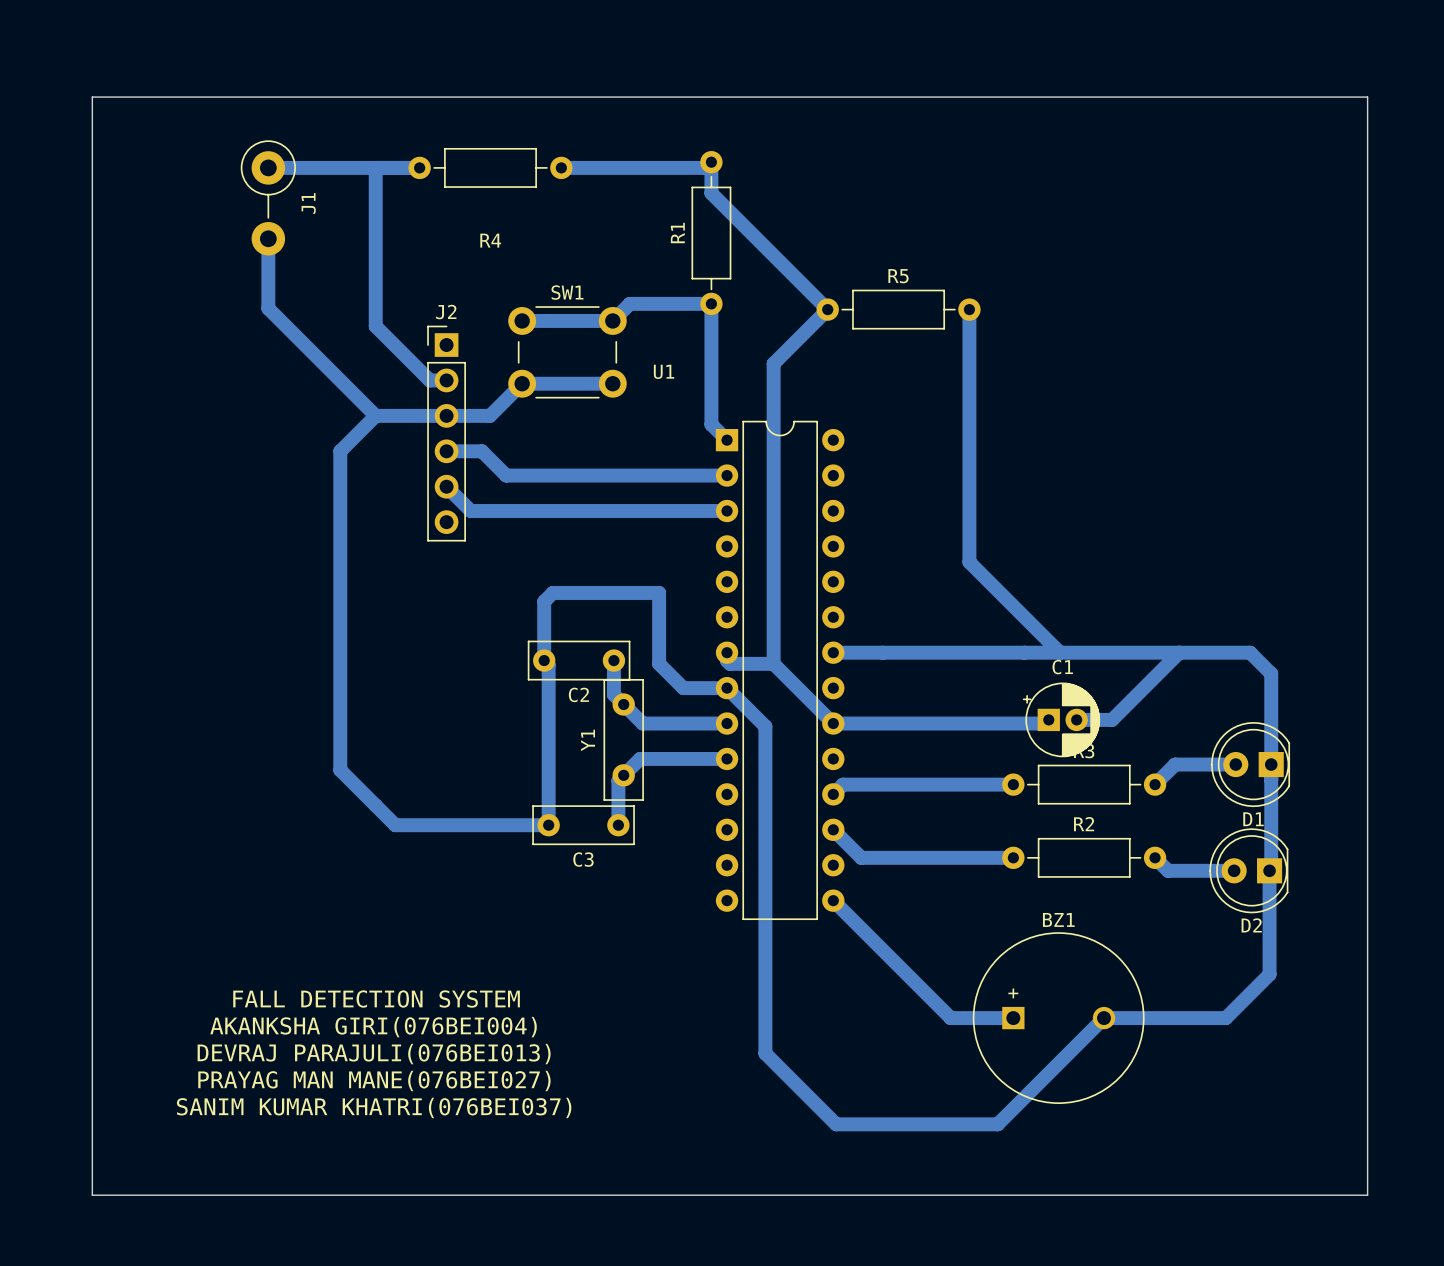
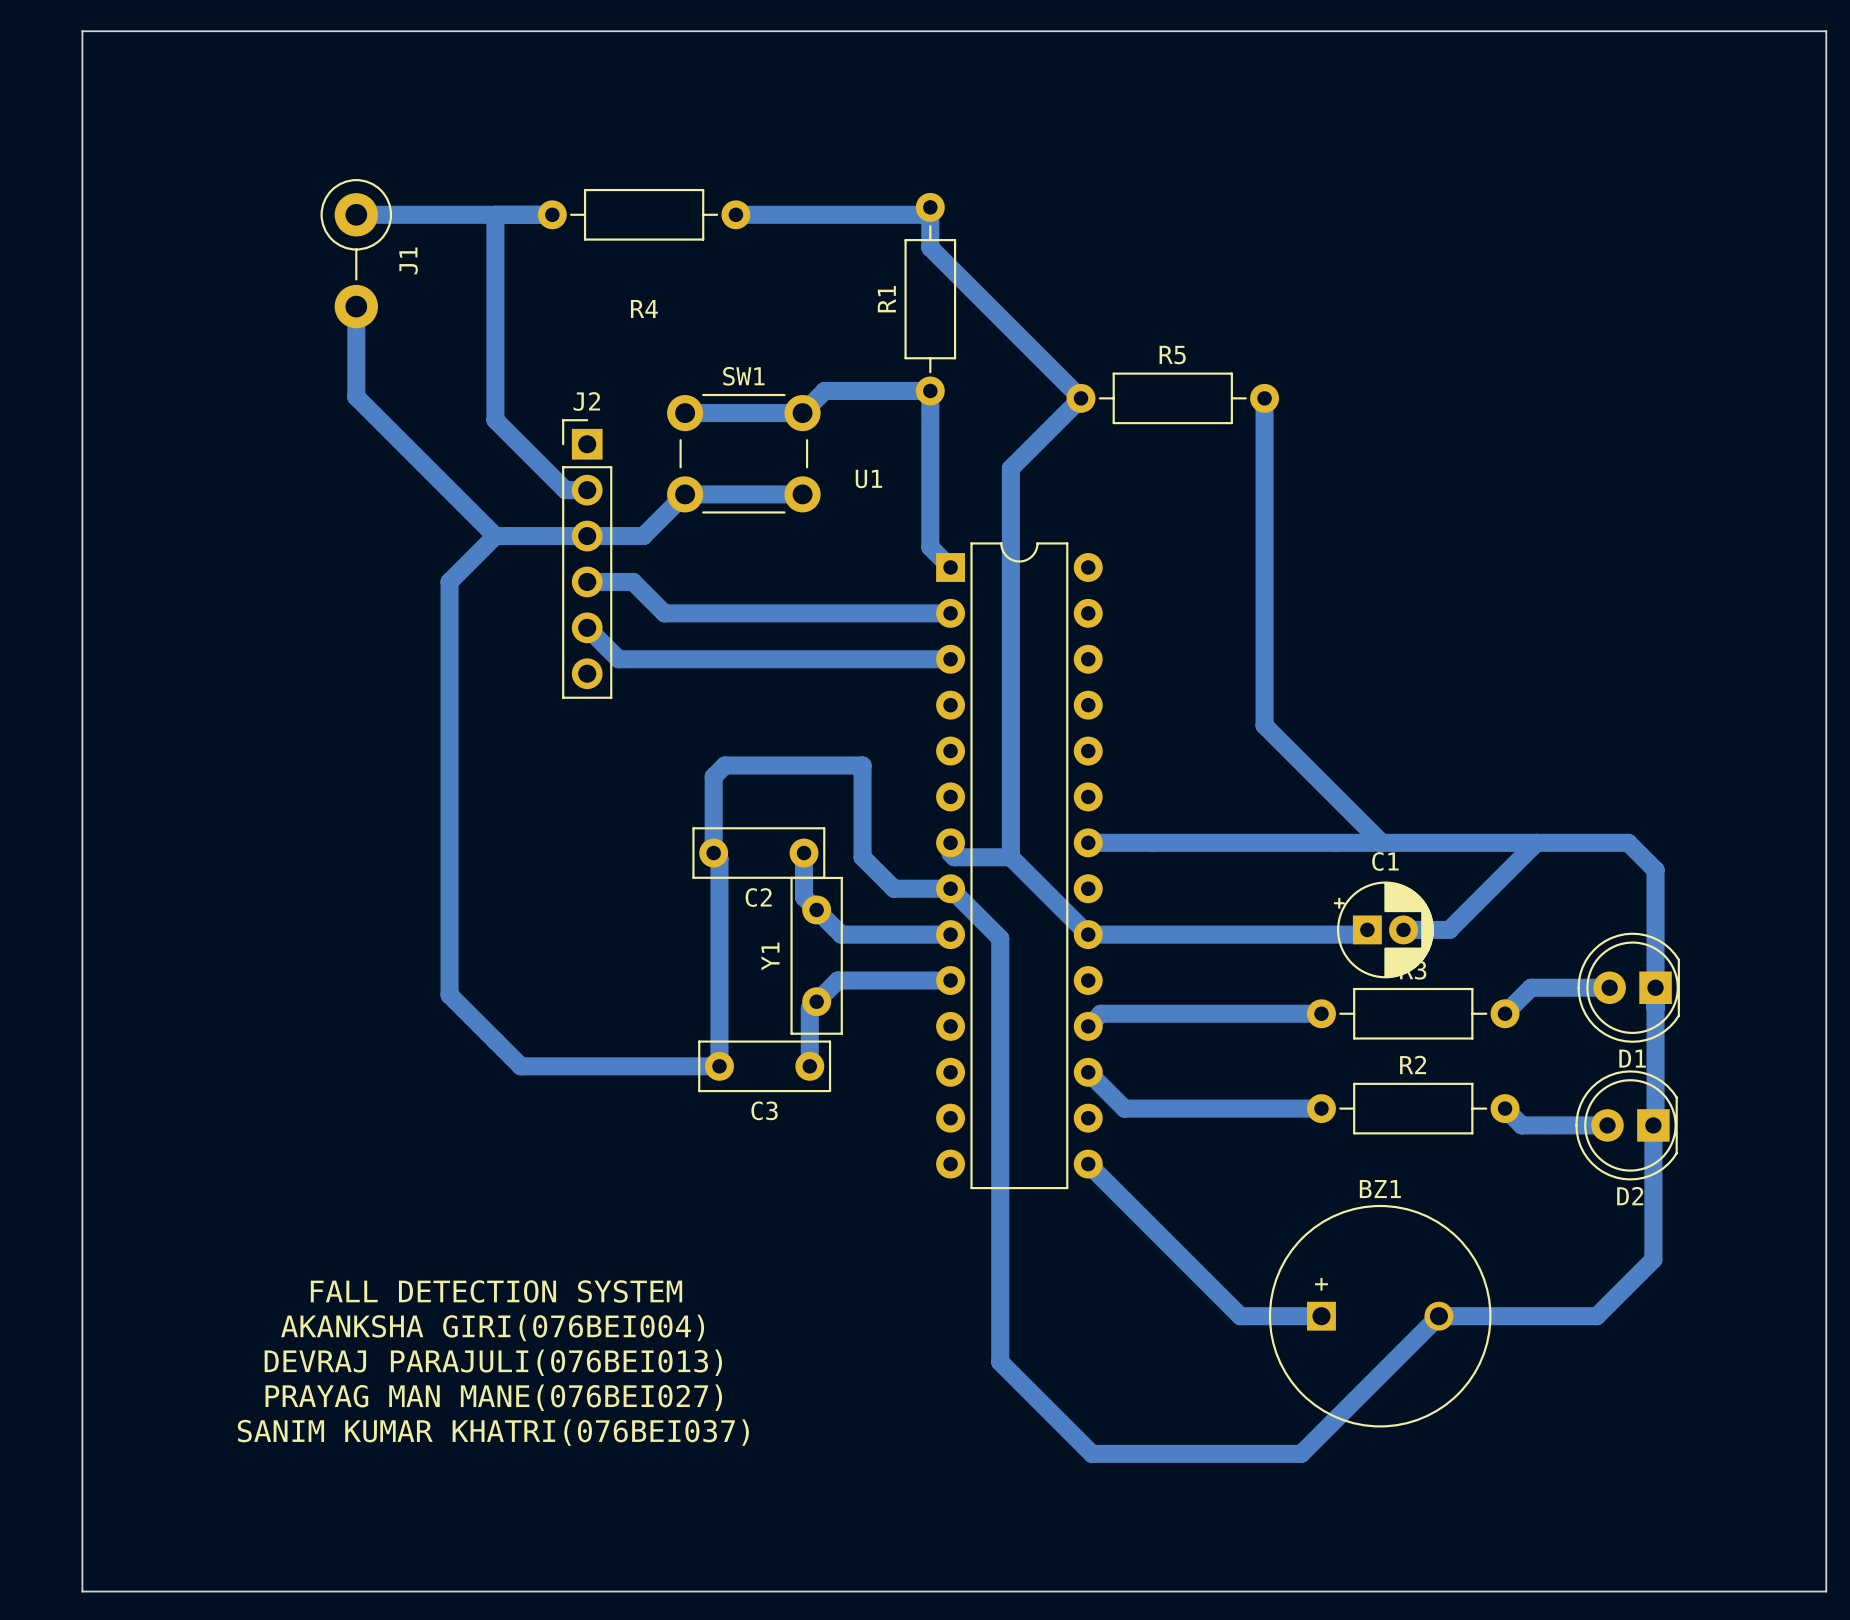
board edge: (92, 97) (92, 1195) (1367, 1195) (1367, 97) (92, 97) -> (82, 31) (82, 1591) (1826, 1591) (1826, 31) (82, 31)

